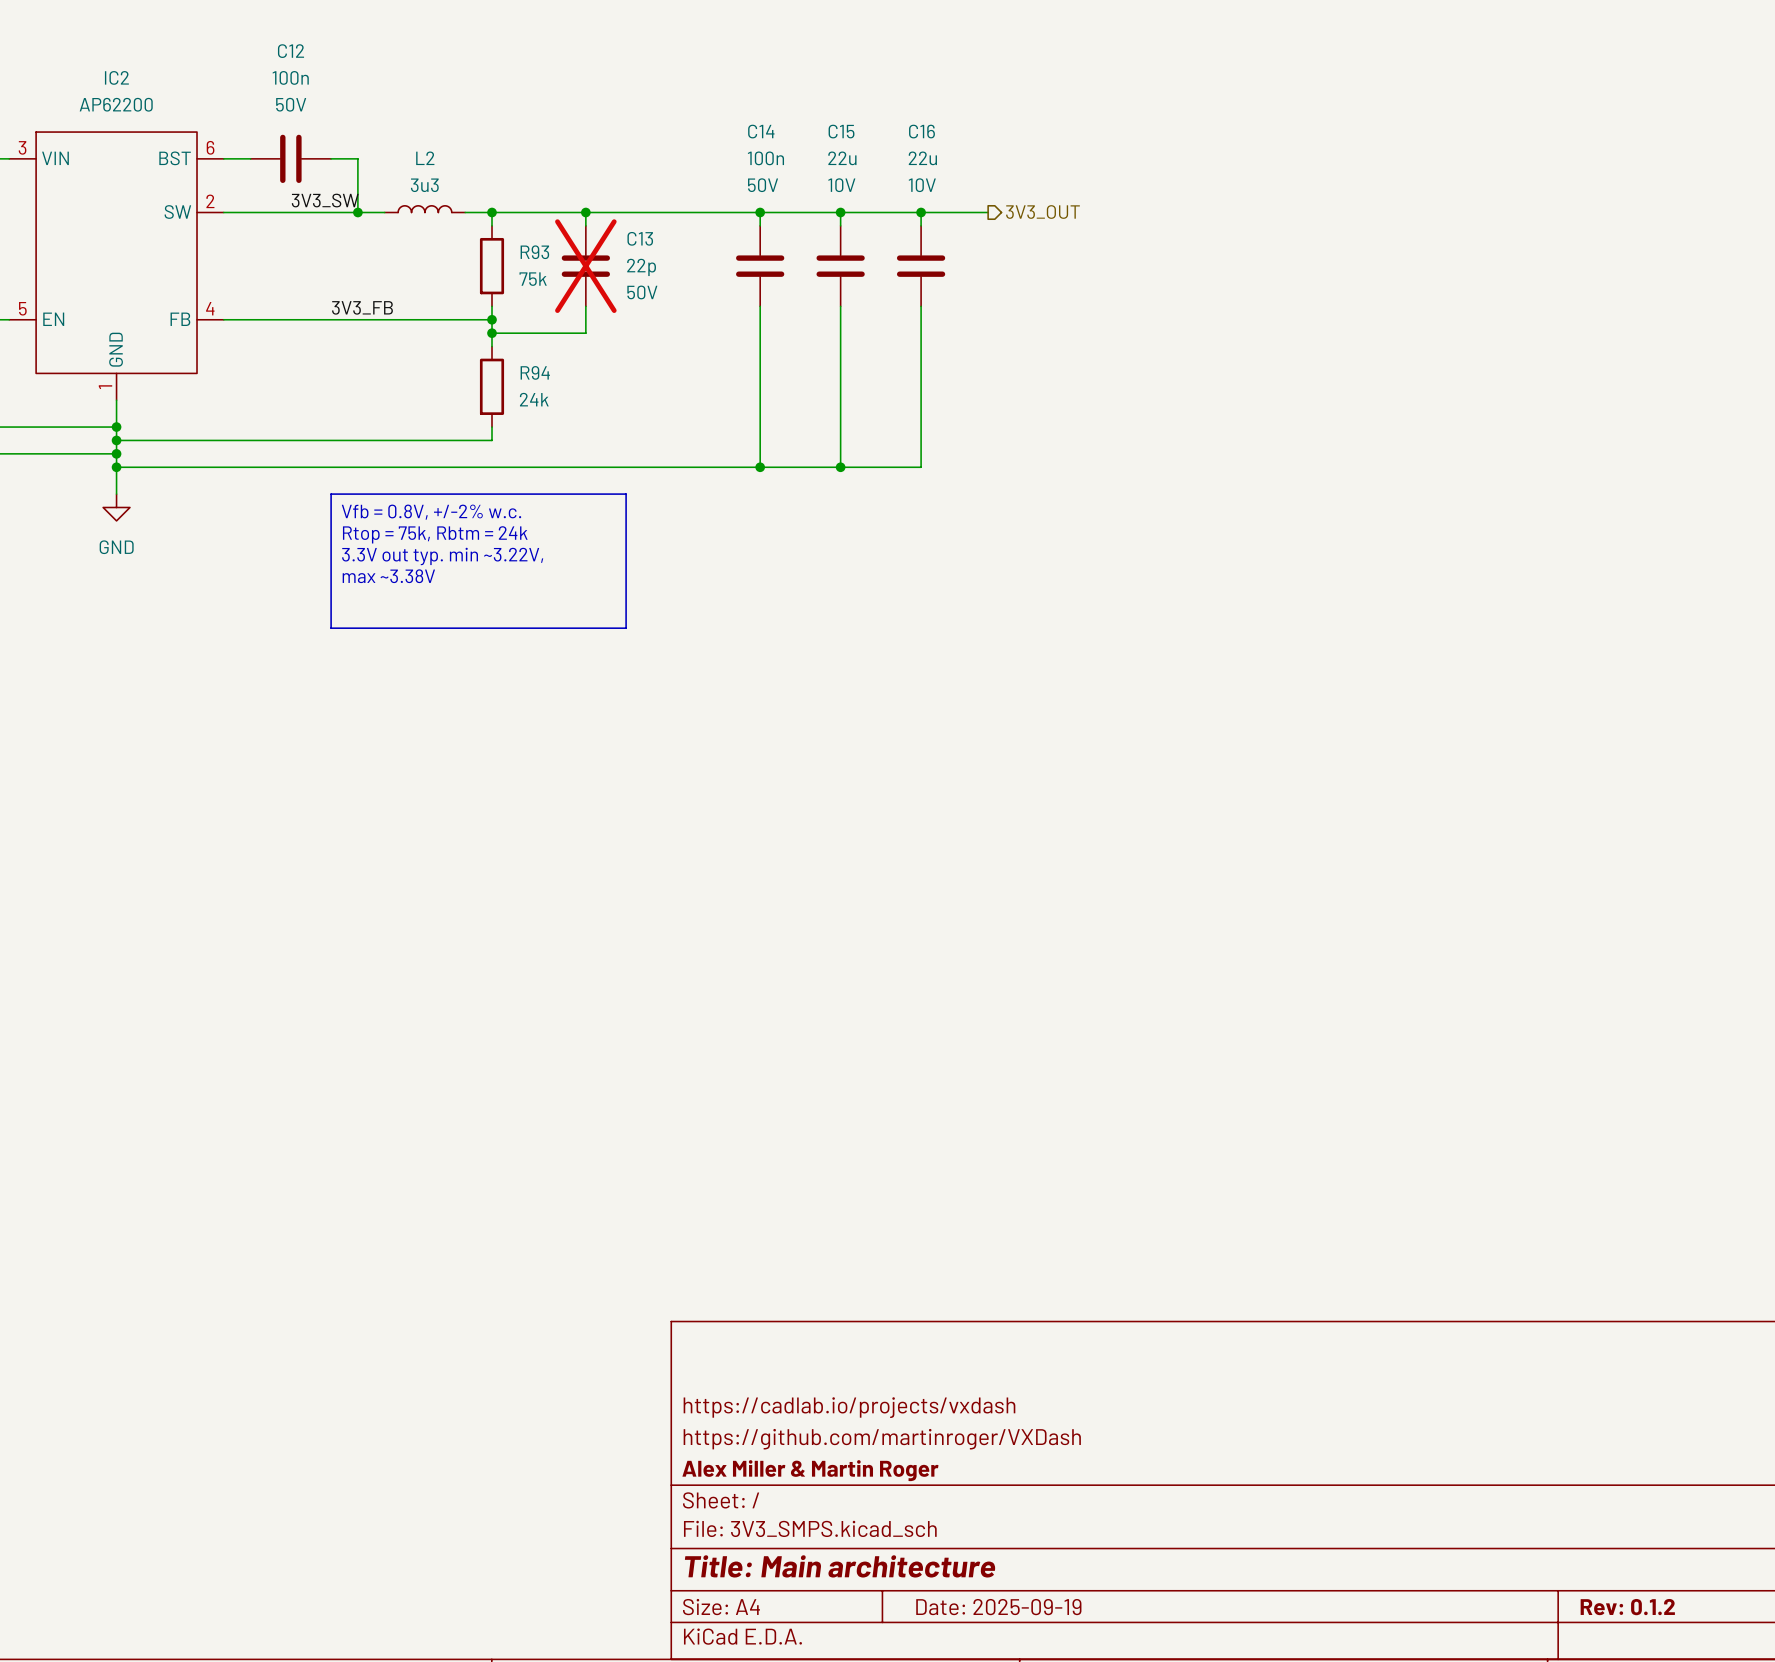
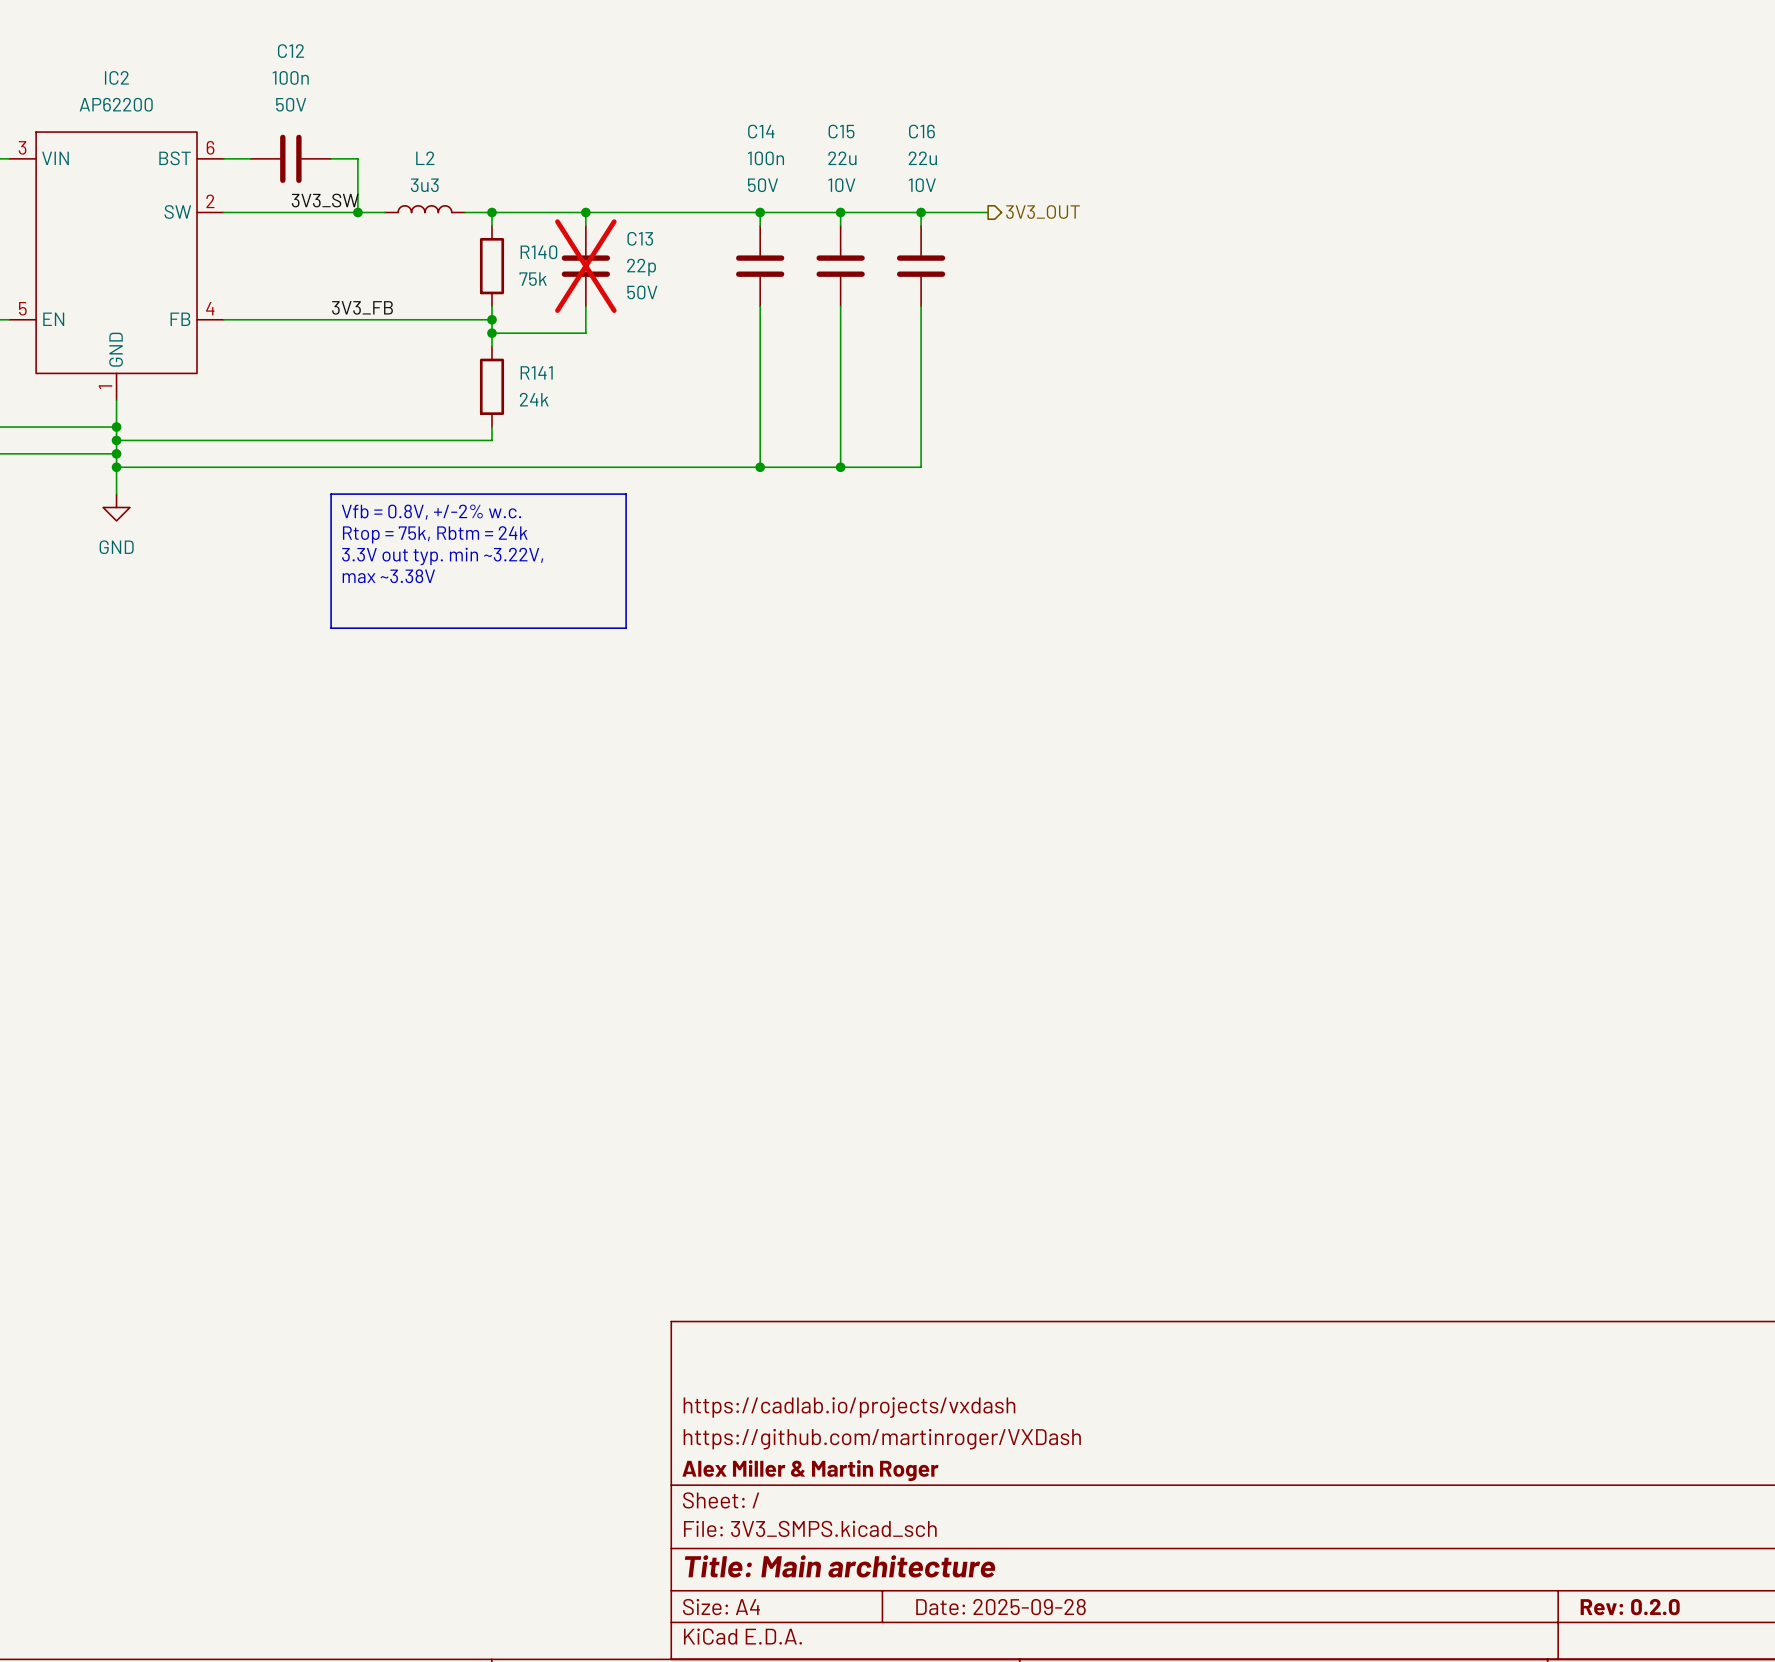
R93 name: R93 (534, 252) -> R140 (538, 252)
R94 name: R94 (535, 372) -> R141 (536, 372)
title block: Date: 2025-09-19 (998, 1607) -> Date: 2025-09-28 (1000, 1607)
title block: Rev: 0.1.2 (1627, 1607) -> Rev: 0.2.0 (1630, 1607)

